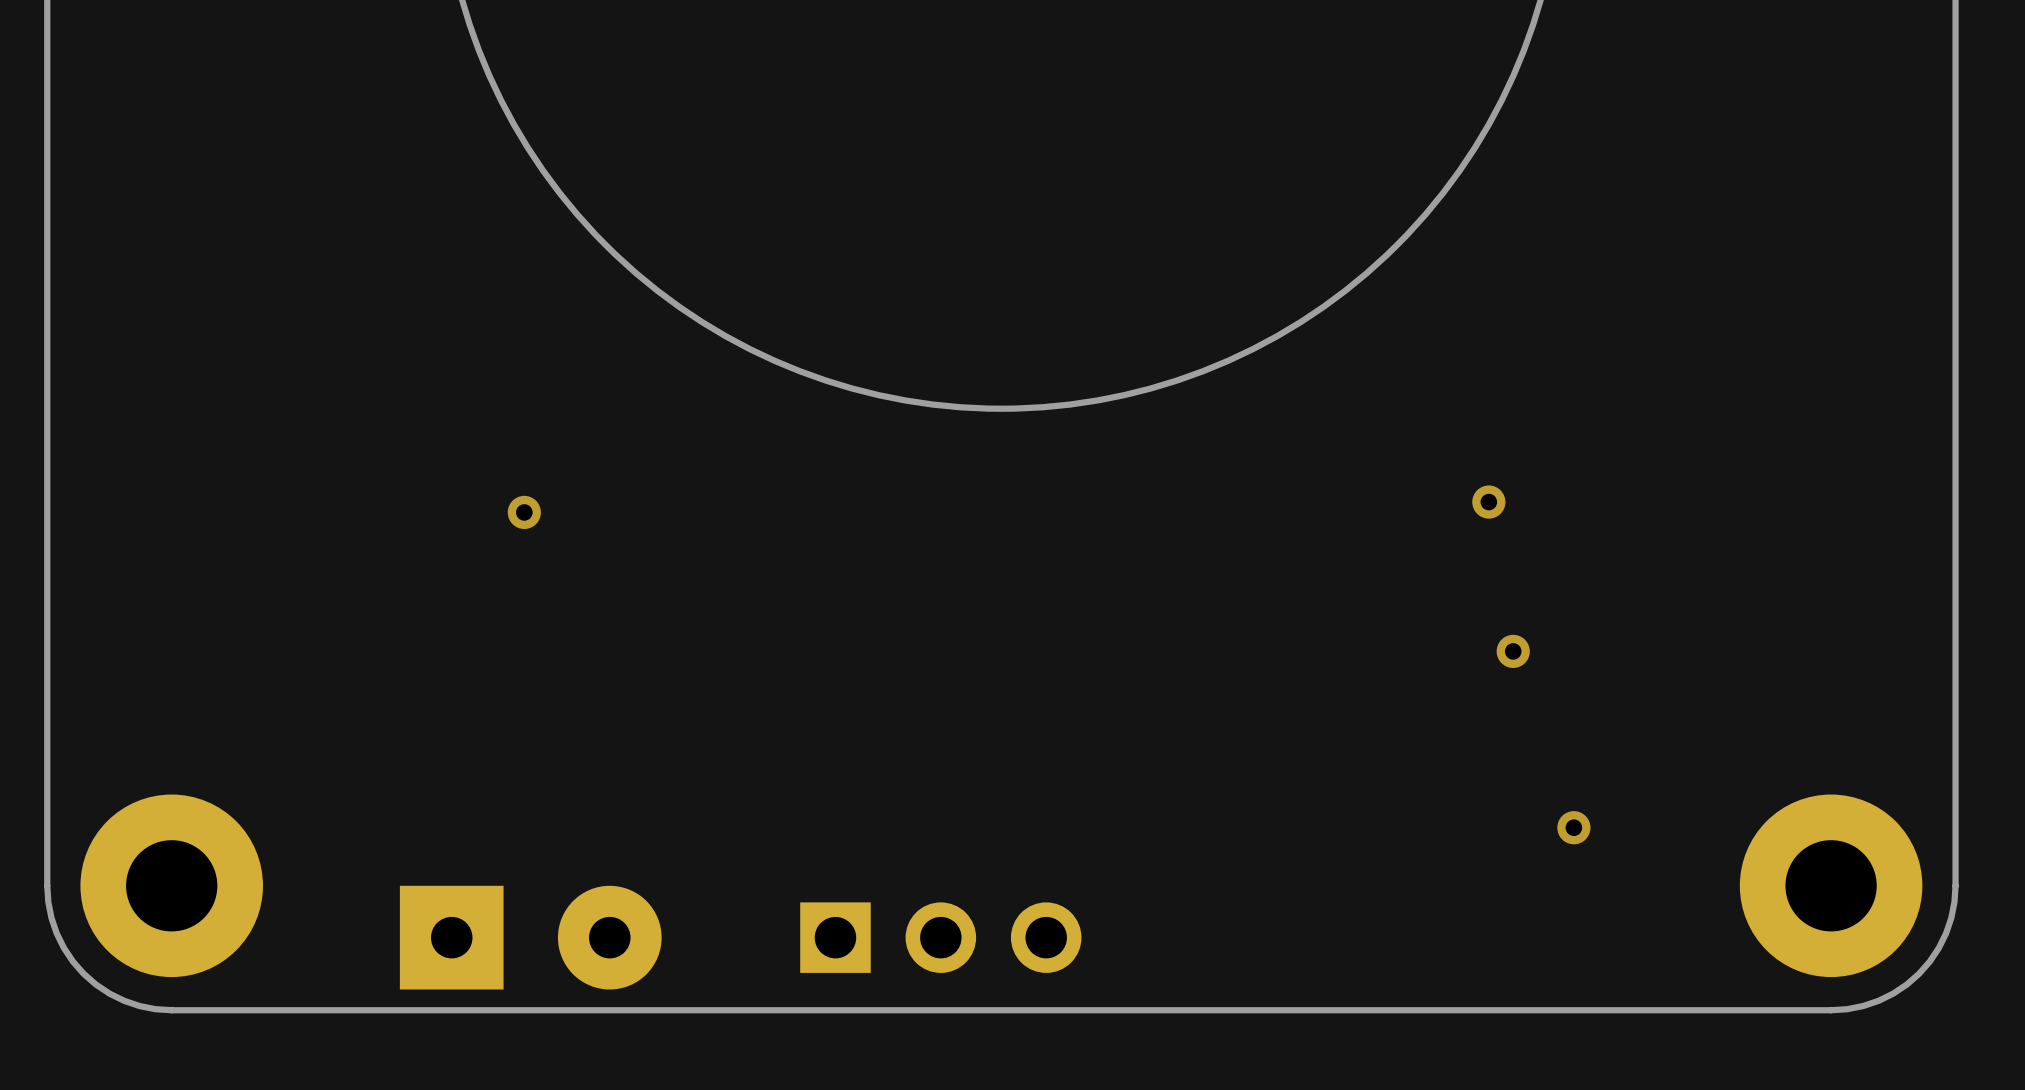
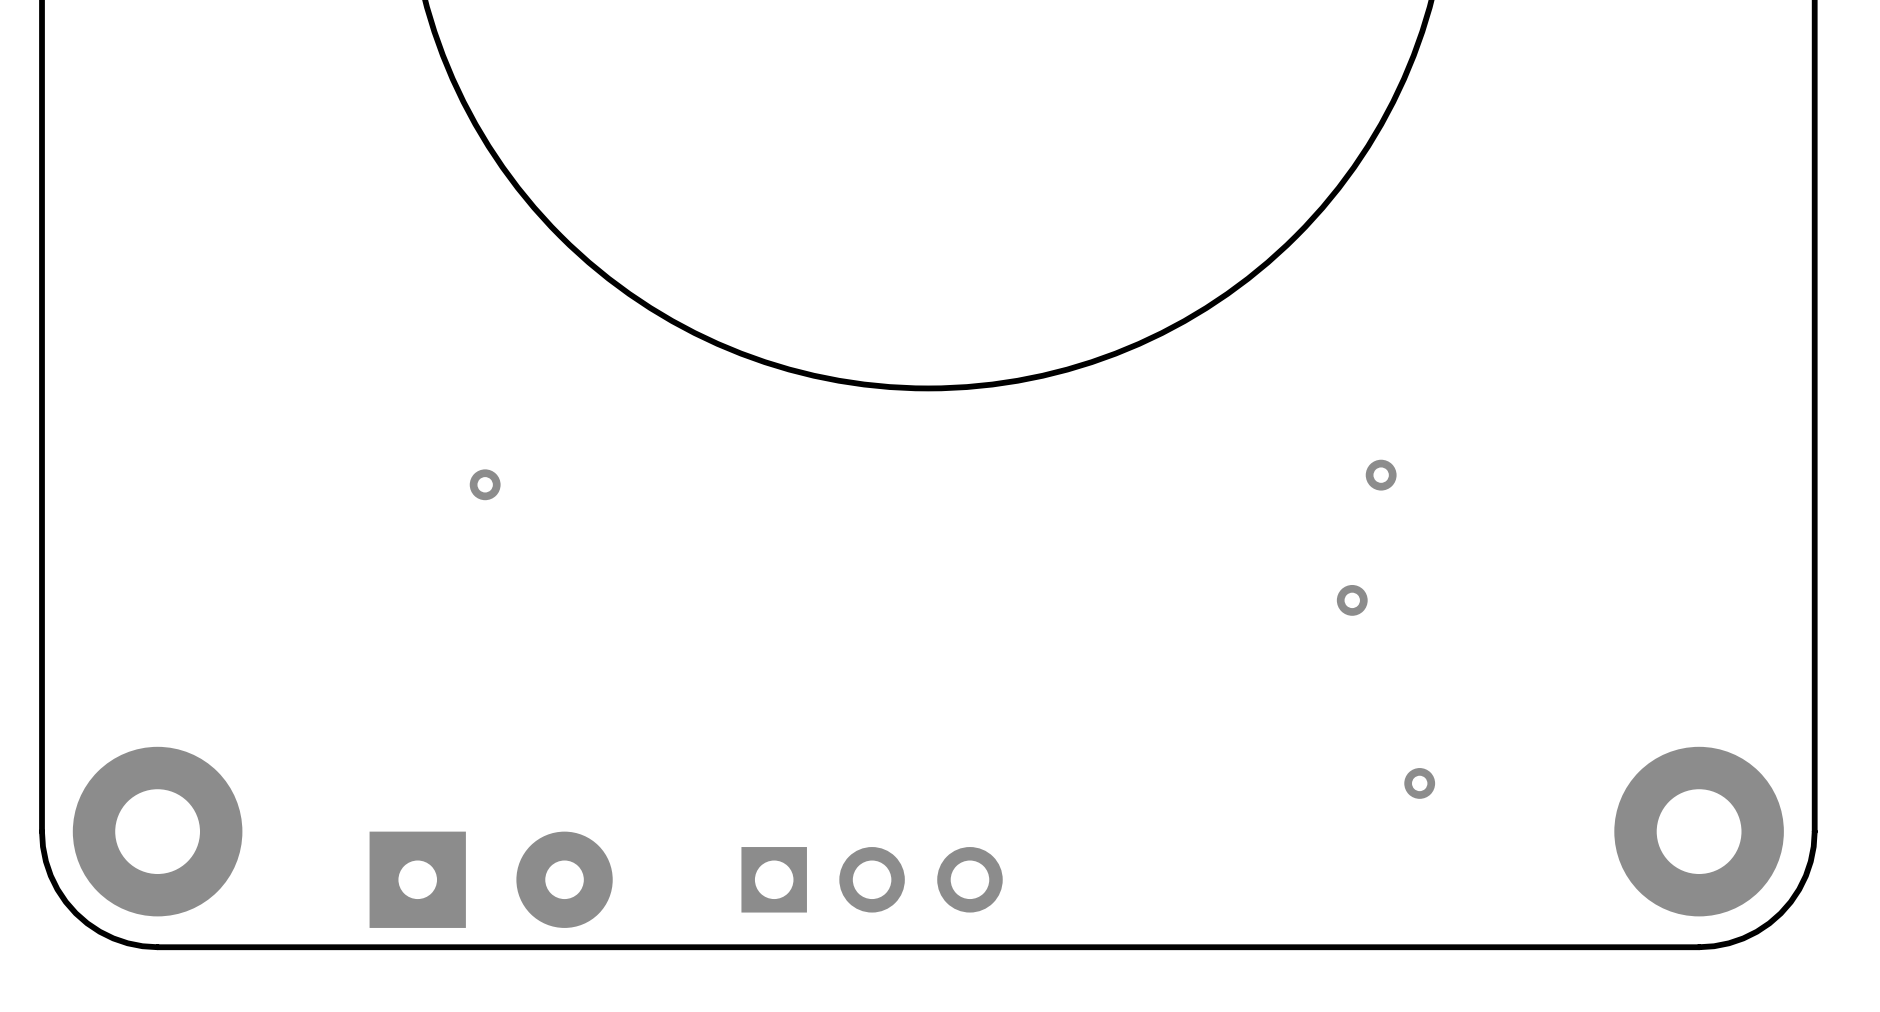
via position: (1513, 651) -> (1352, 600)
via position: (1573, 827) -> (1419, 783)

